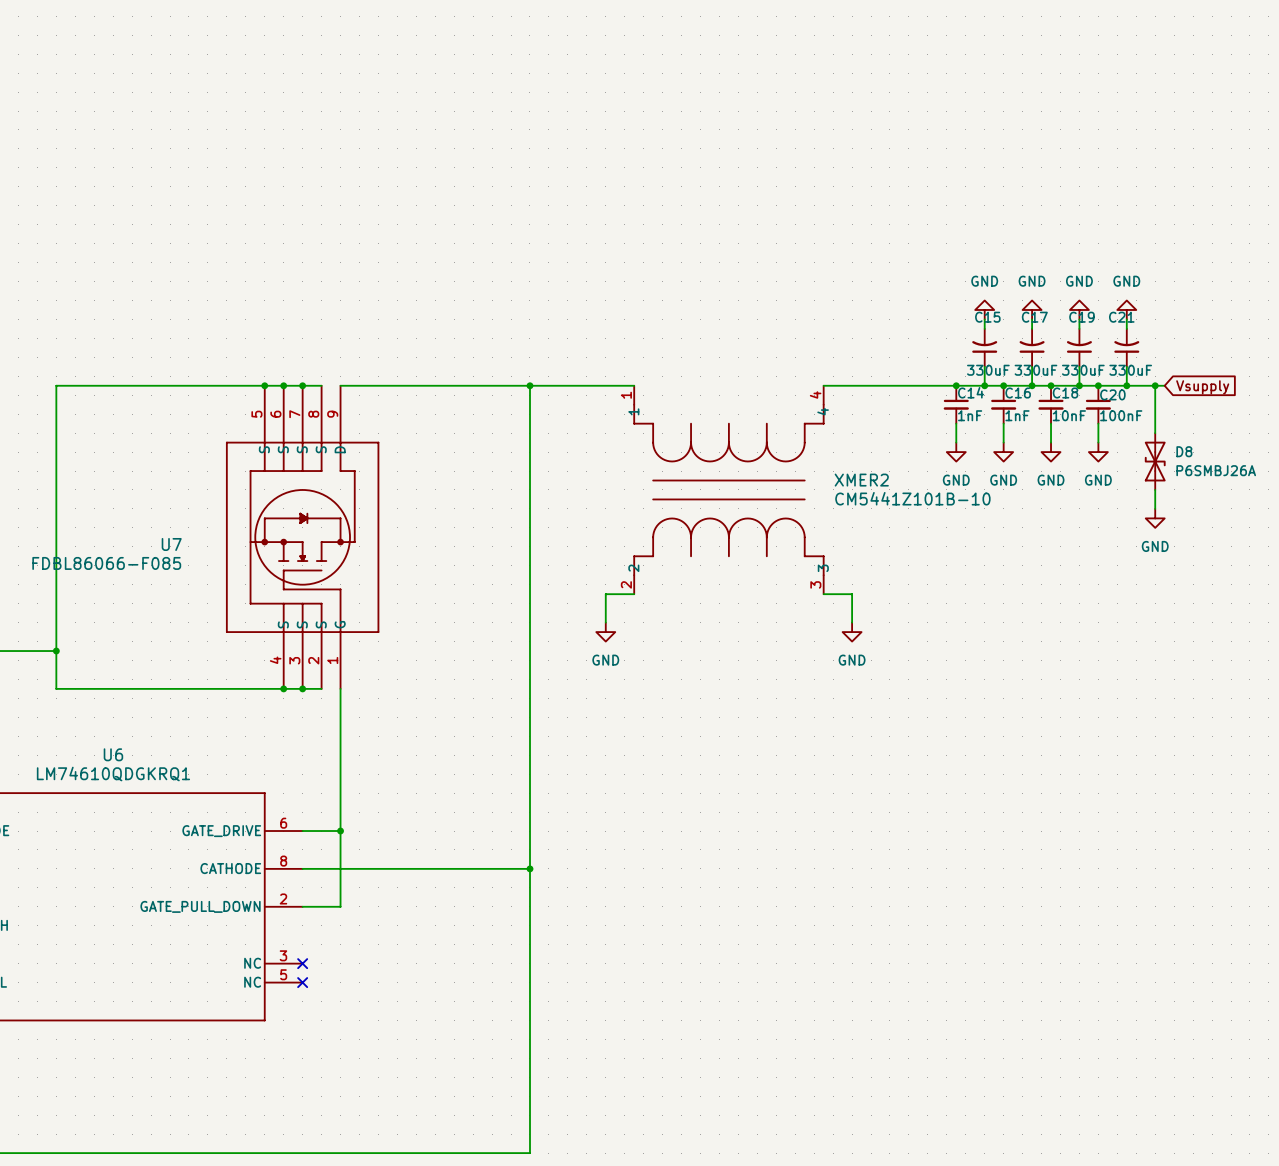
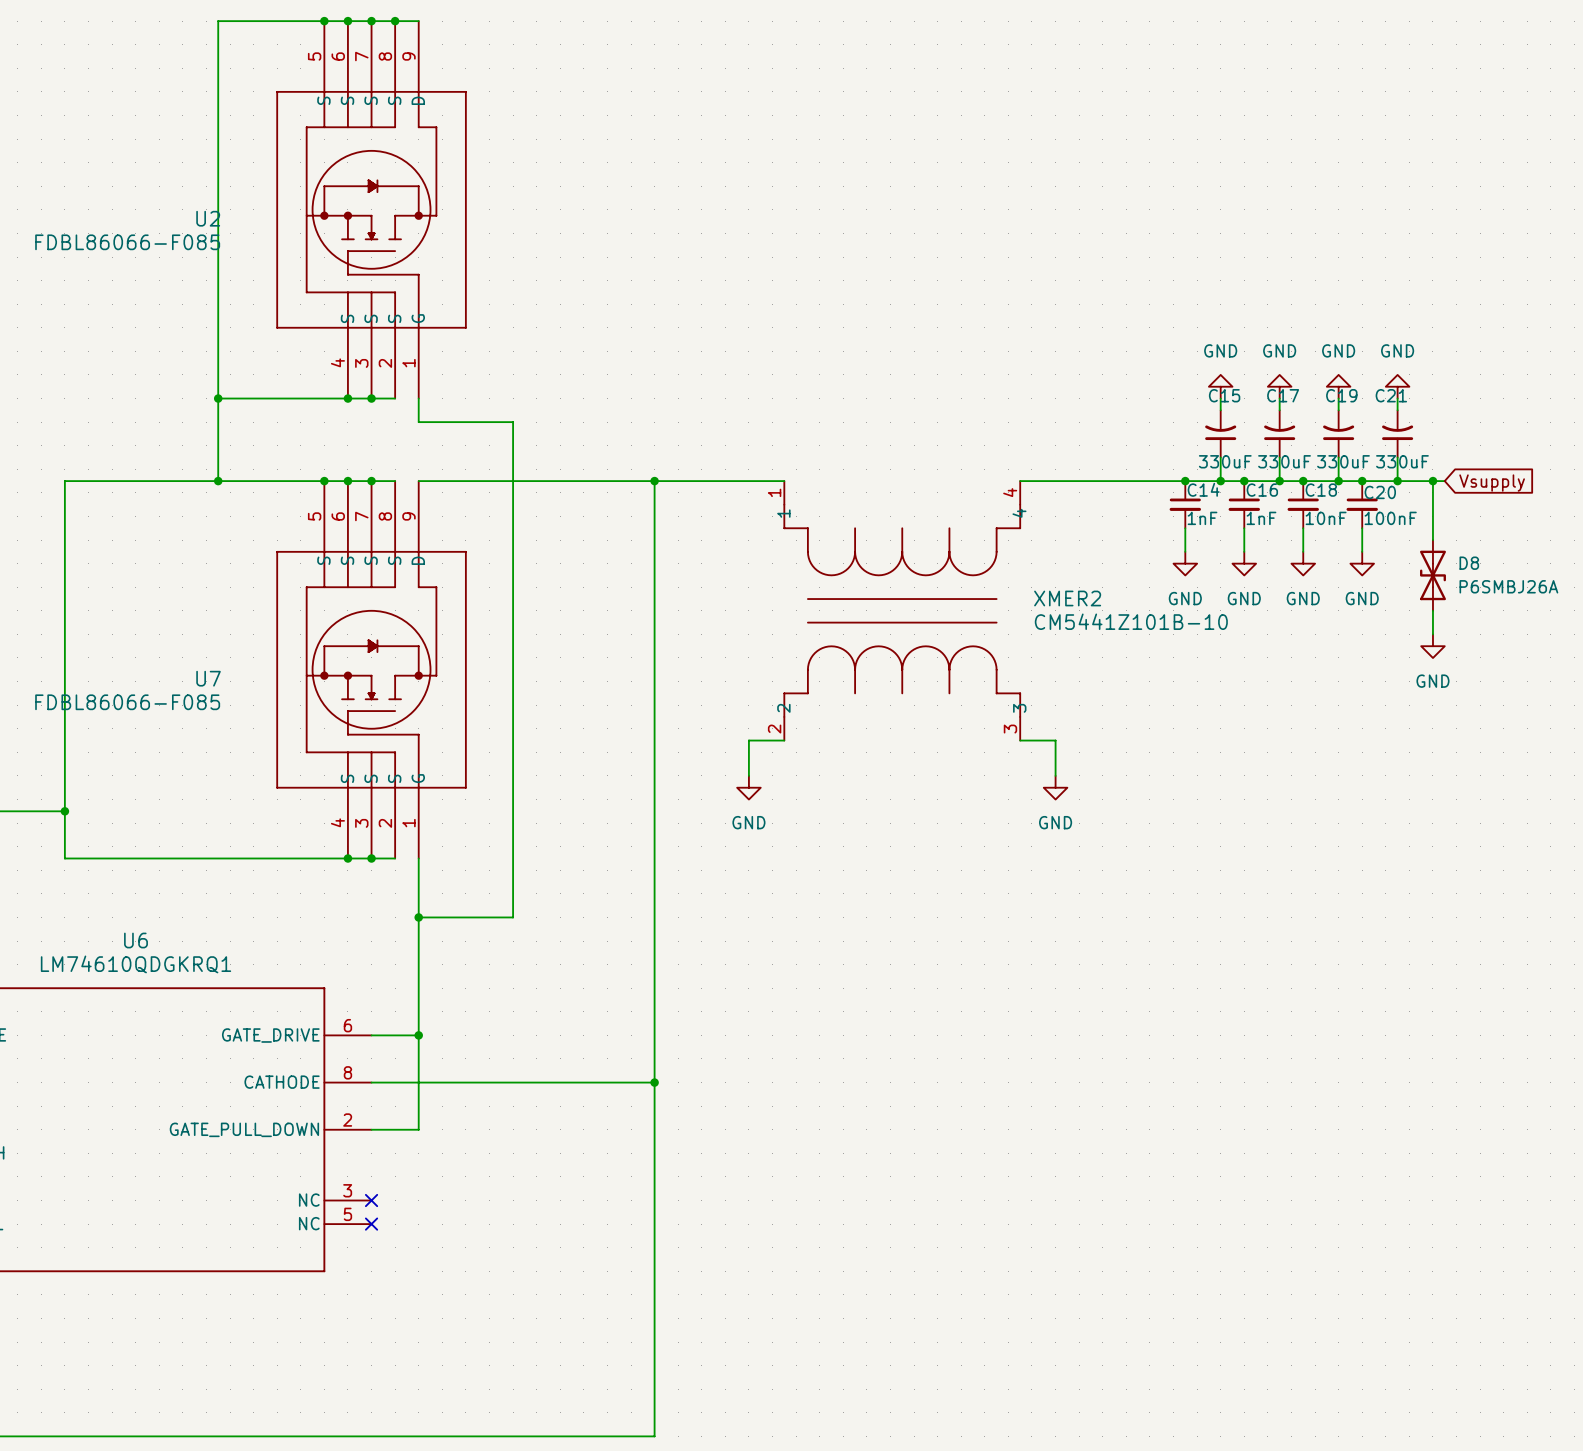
junction: none -> (324, 21)
junction: none -> (347, 21)
junction: none -> (371, 21)
junction: none -> (395, 21)
wire: none -> (418, 21) (218, 21) (218, 481)
U2: none -> FDBL86066-F085 (371, 209)
wire: none -> (218, 398) (395, 398)
junction: none -> (218, 398)
junction: none -> (347, 398)
junction: none -> (371, 398)
wire: none -> (418, 398) (418, 422) (513, 422) (513, 917) (418, 917)
junction: none -> (218, 481)
junction: none -> (418, 917)

